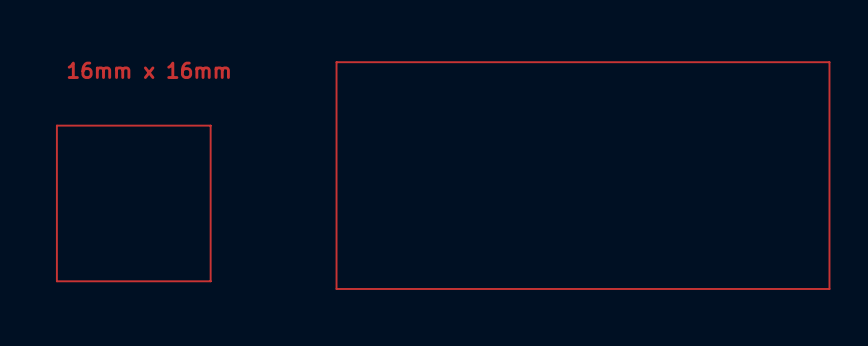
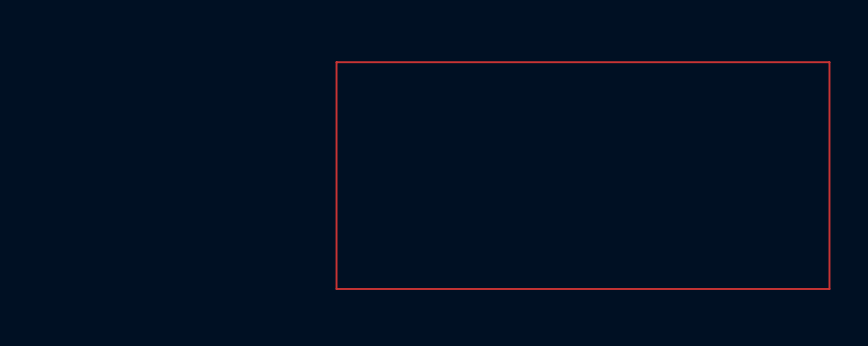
text: 16mm x 16mm (148, 70) -> none
top track: (56, 125) (210, 125) (210, 281) (56, 281) (56, 125) -> none

